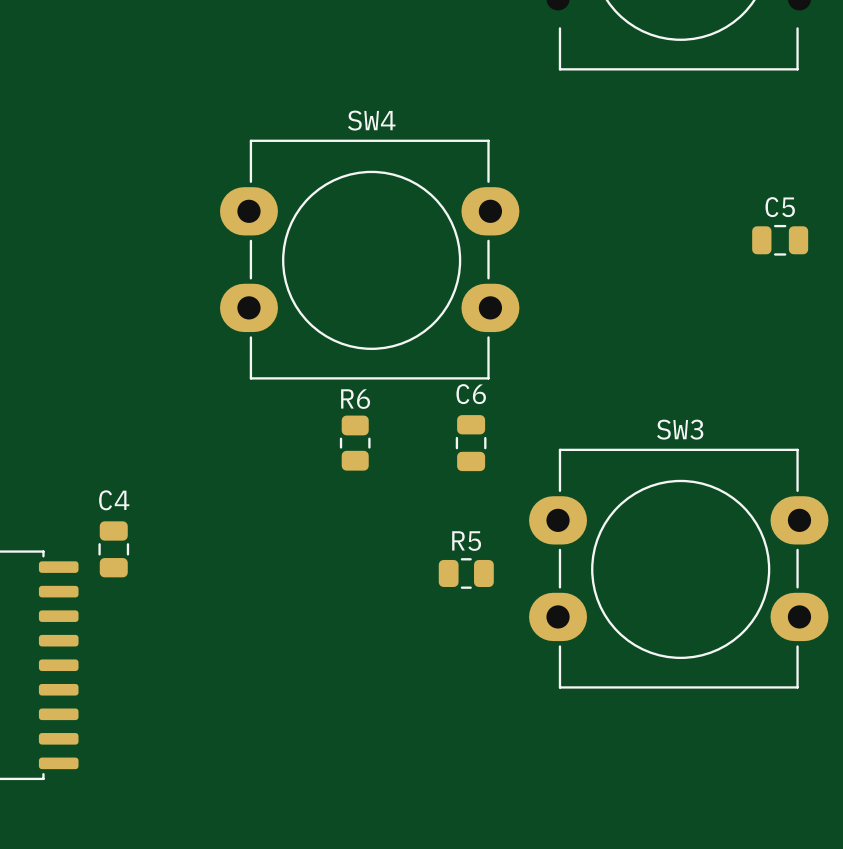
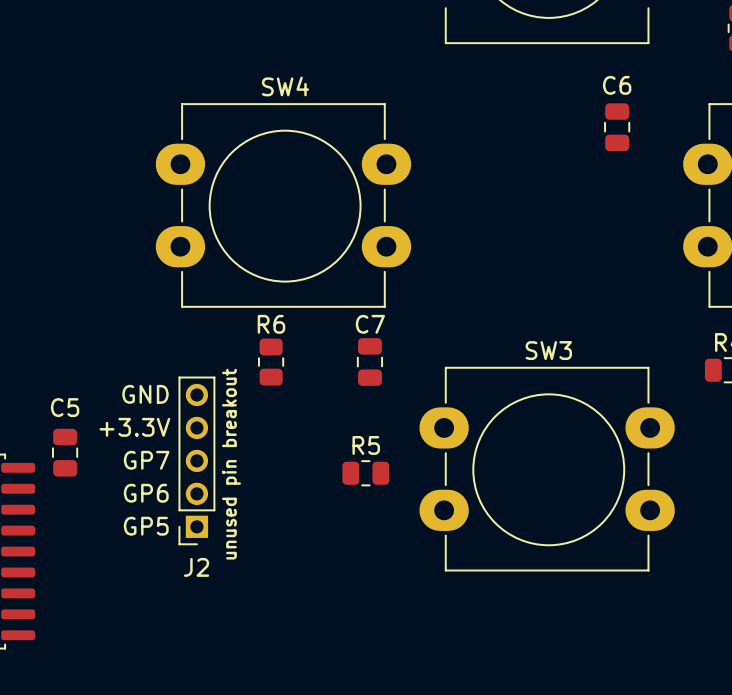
C6: none -> (617, 127)
C5: (780, 240) -> none
C6 name: C6 (471, 394) -> C7 (370, 324)
text: none -> GND (145, 394)
C4 name: C4 (114, 500) -> C5 (65, 407)
text: none -> +3.3V (134, 427)
text: none -> GP7 (146, 460)
J2: none -> (196, 460)
text: none -> unused pin breakout (231, 464)
text: none -> GP6 (146, 493)
text: none -> GP5 (146, 526)

